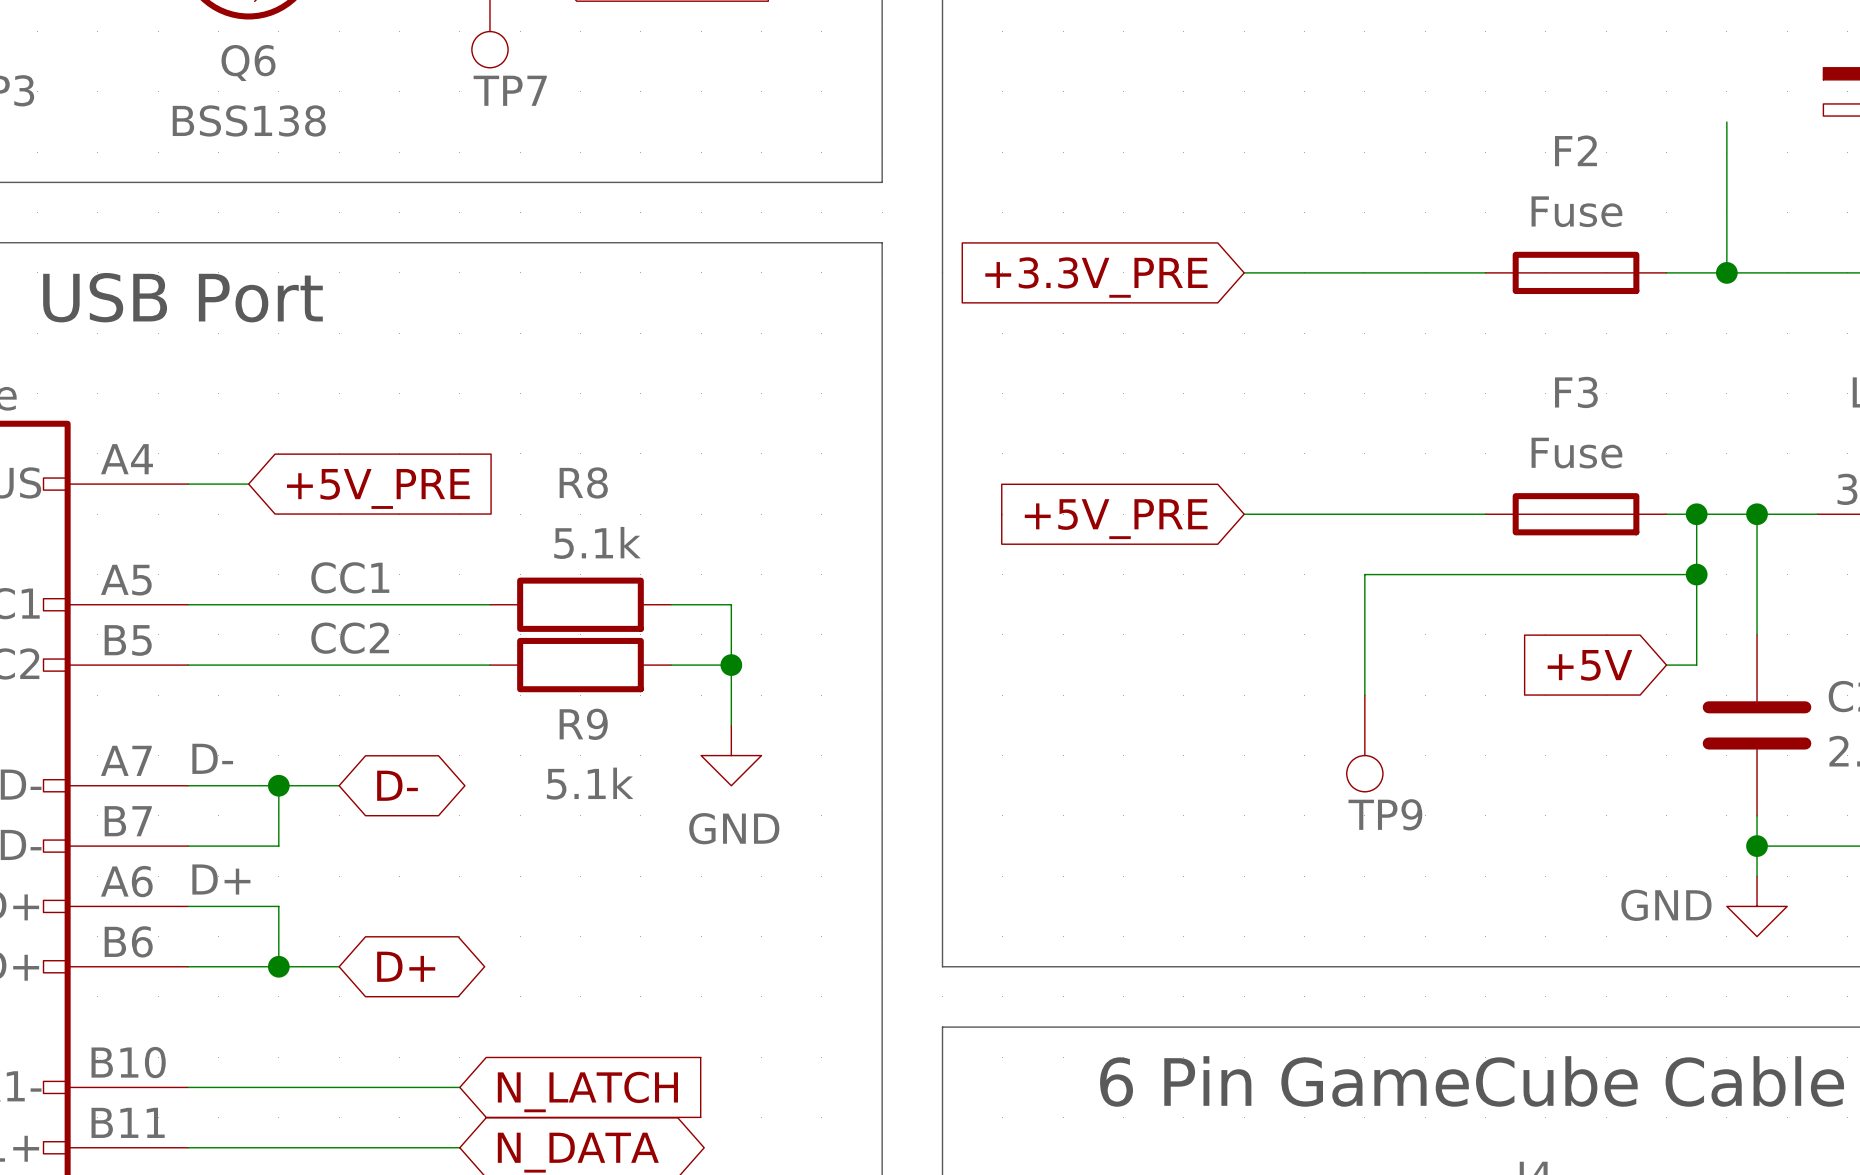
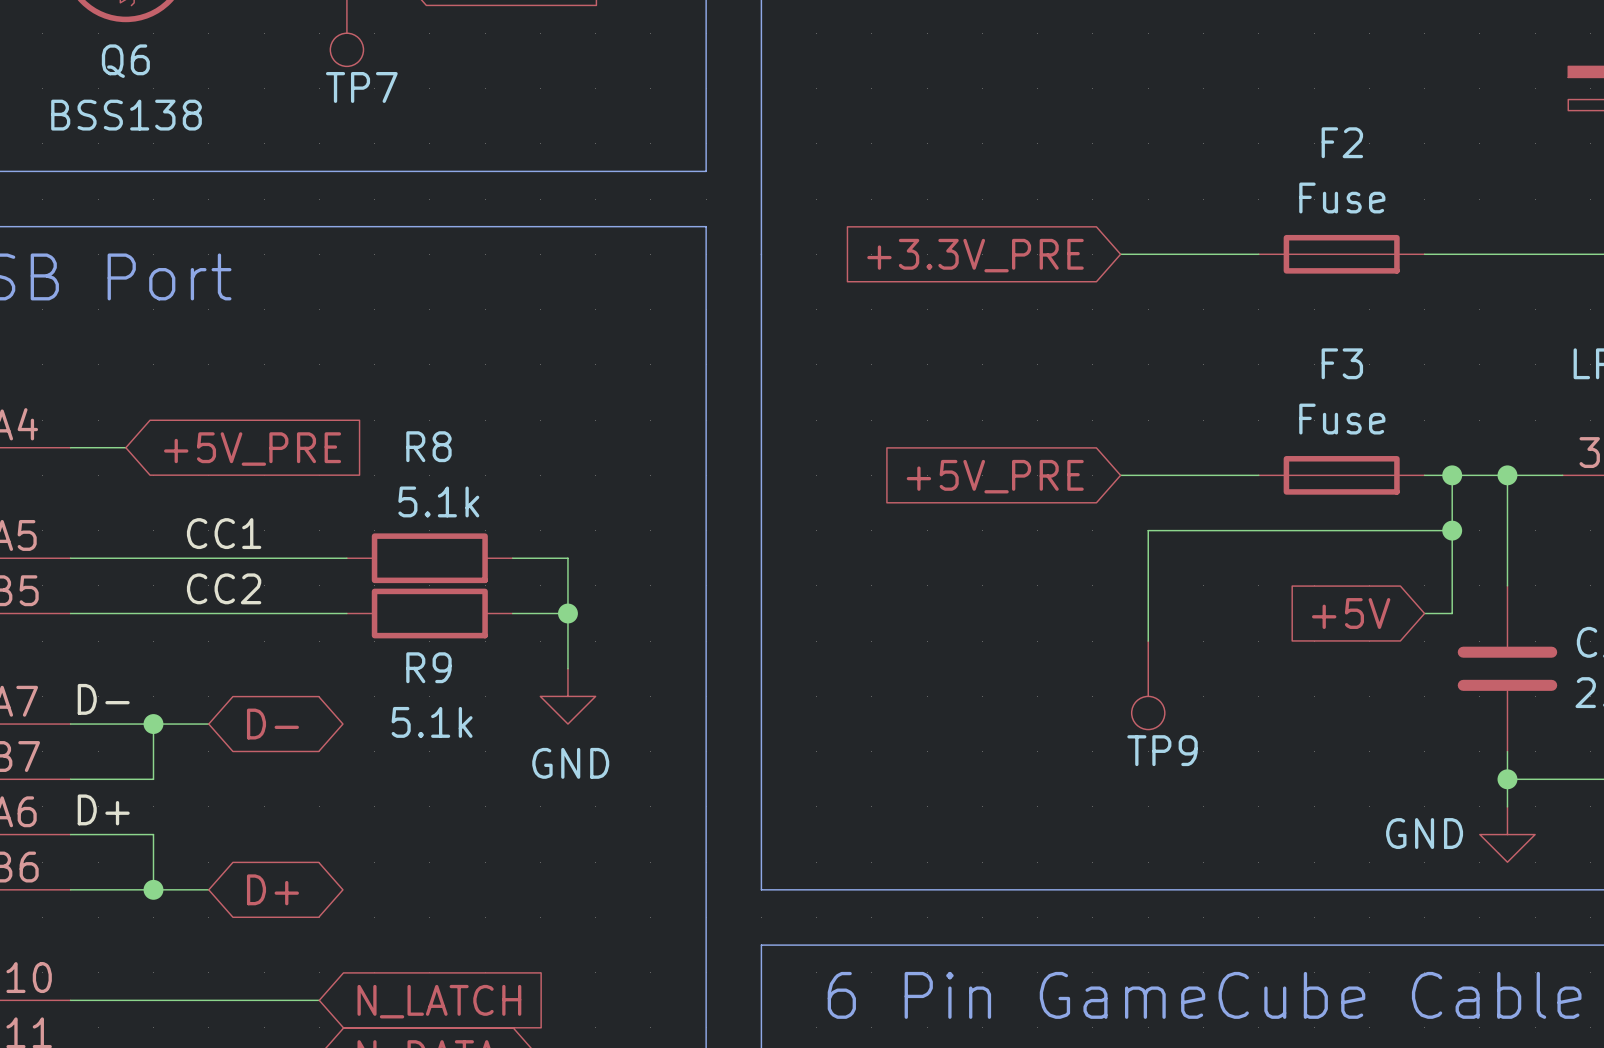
wire: (1726, 122) (1726, 272) -> none
wire: (1244, 272) (1334, 272) -> none
junction: (1726, 272) -> none
global label position: +3.3V_PRE (1096, 277) -> +3.3V_PRE (975, 255)
wire: (1244, 514) (1334, 514) -> none
global label position: +5V_PRE (1116, 519) -> +5V_PRE (995, 476)

